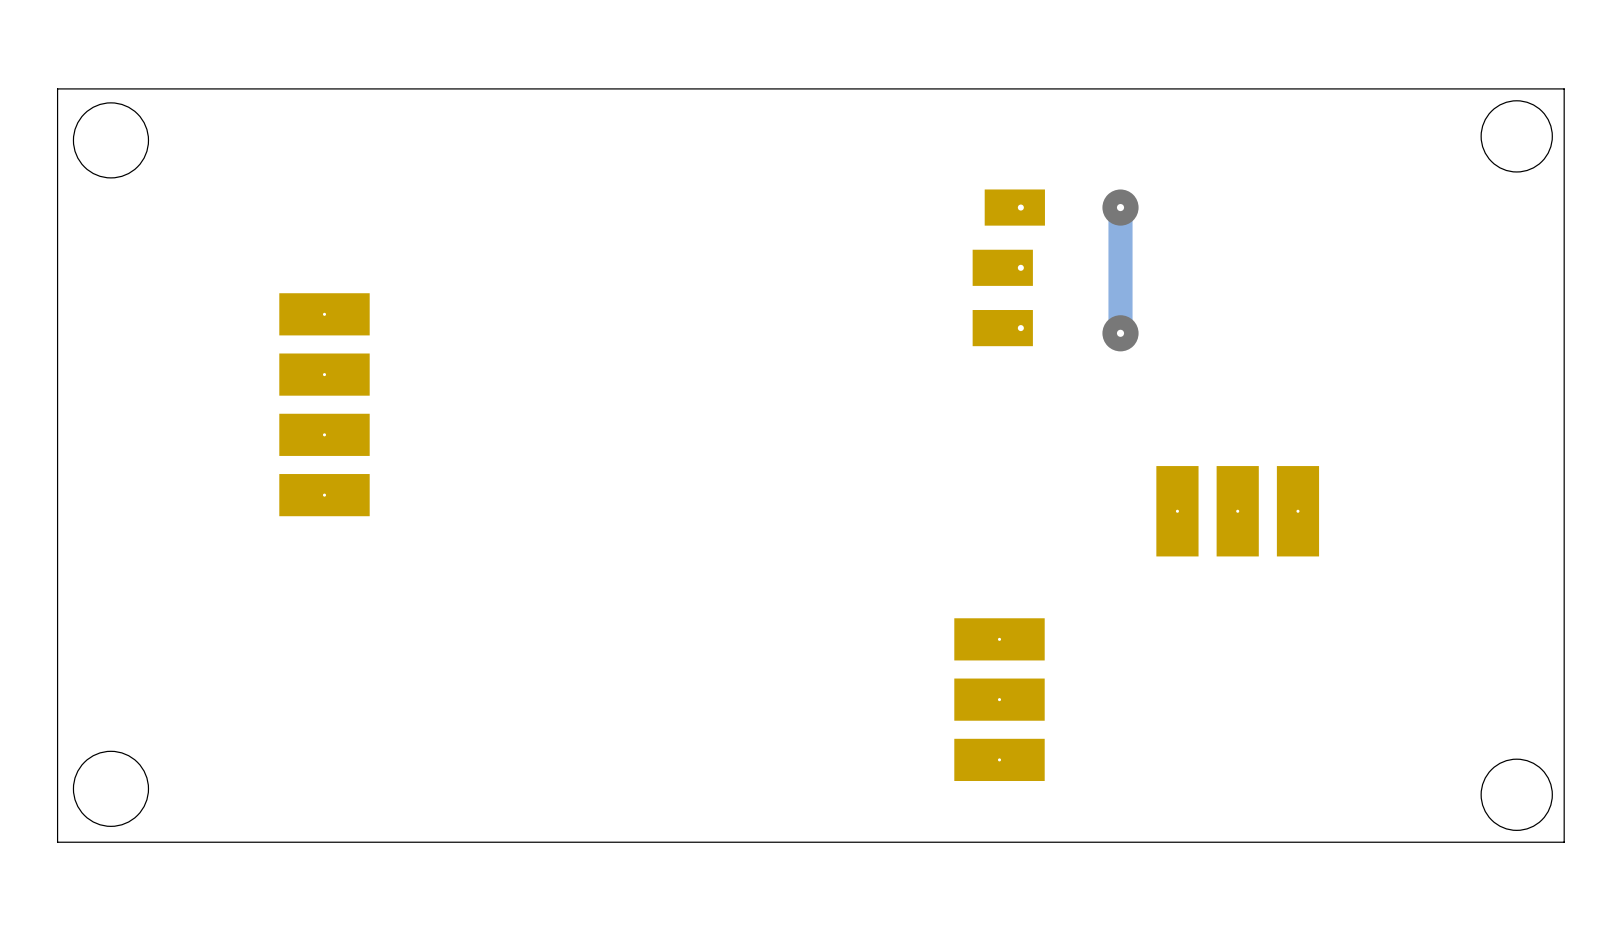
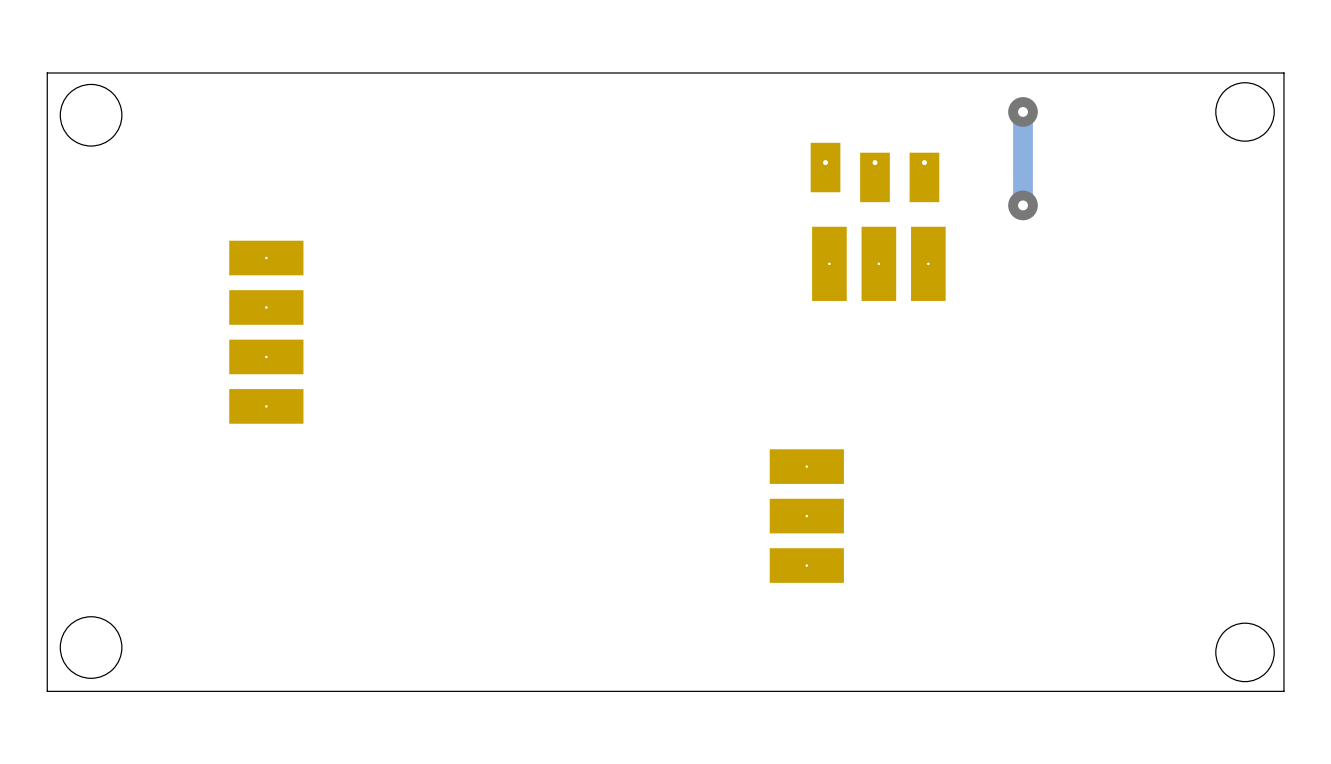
track: none -> (1023, 111) (1023, 205)
via: none -> (1023, 111)
track: (1120, 207) (1120, 333) -> none
via: (1120, 207) -> none
via: none -> (1023, 205)
part rotation: 0° (1008, 267) -> 90° counterclockwise (874, 172)
part: none -> (878, 263)
via: (1120, 333) -> none
part: (1237, 511) -> none
part position: (999, 699) -> (806, 516)

